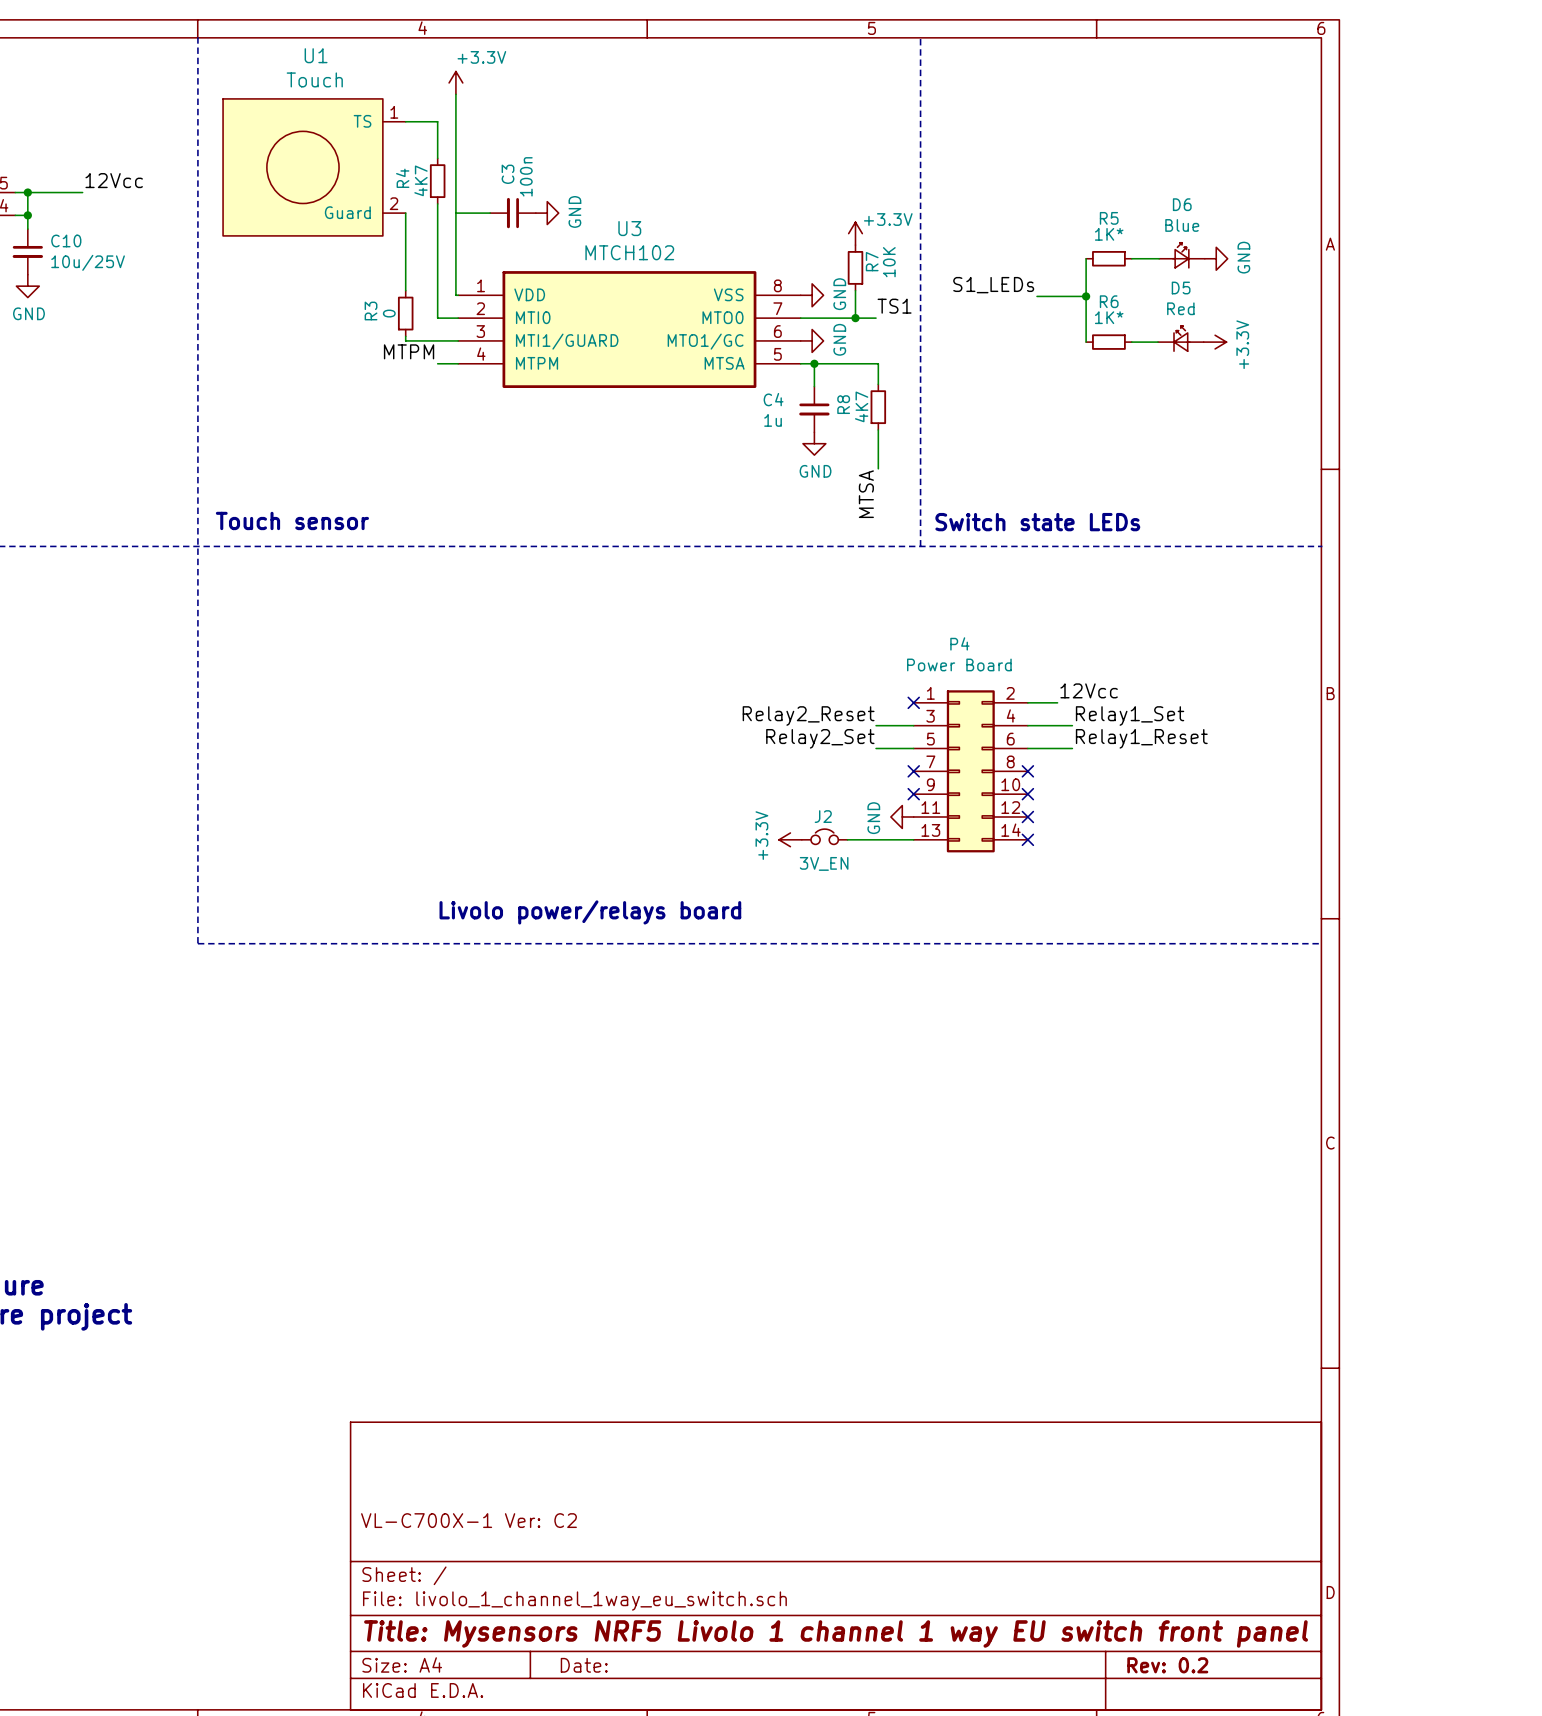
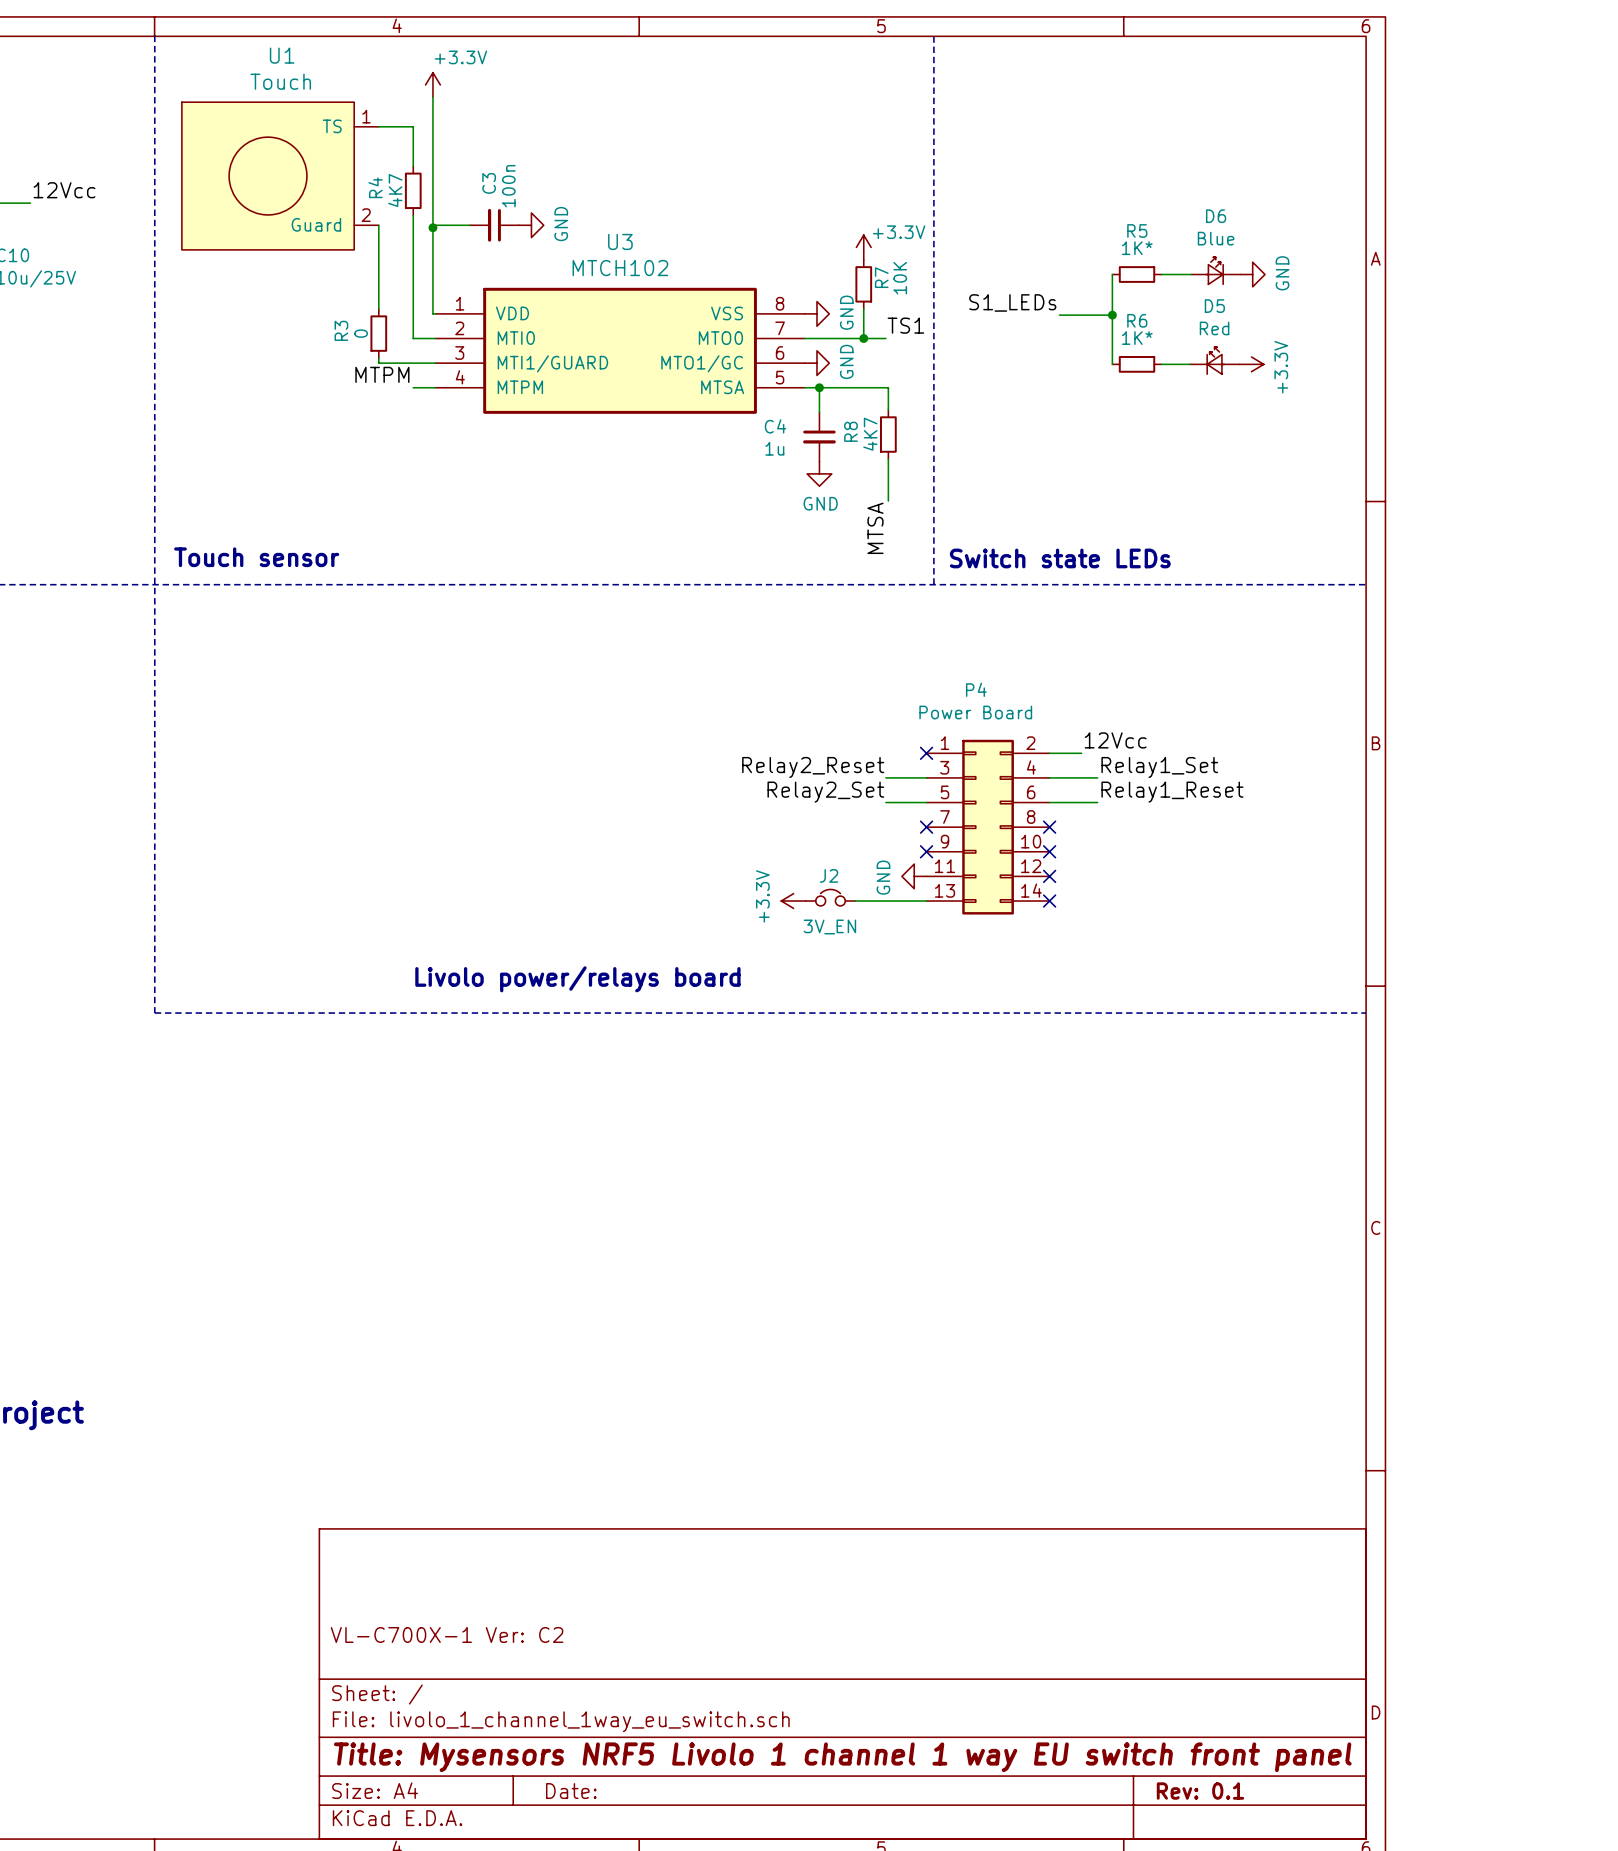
junction: none -> (432, 227)
title block: Rev: 0.2 (1167, 1665) -> Rev: 0.1 (1200, 1791)

